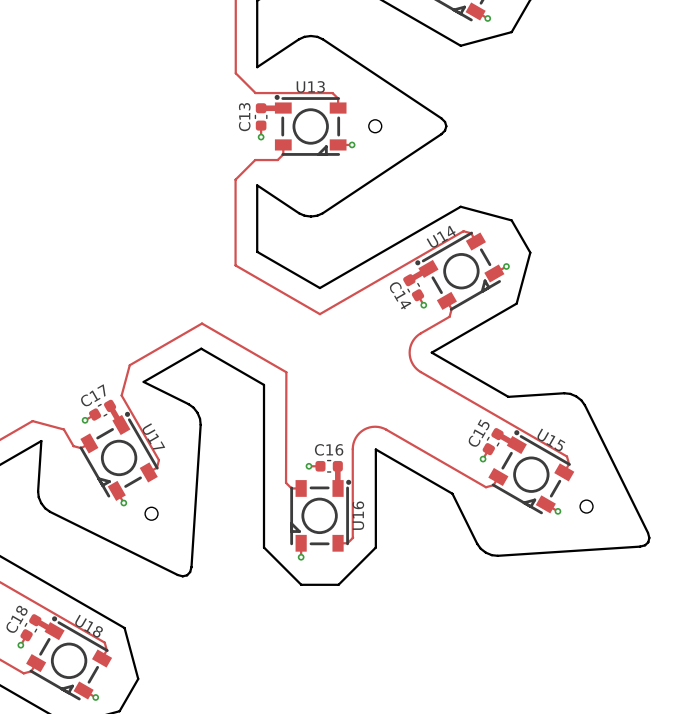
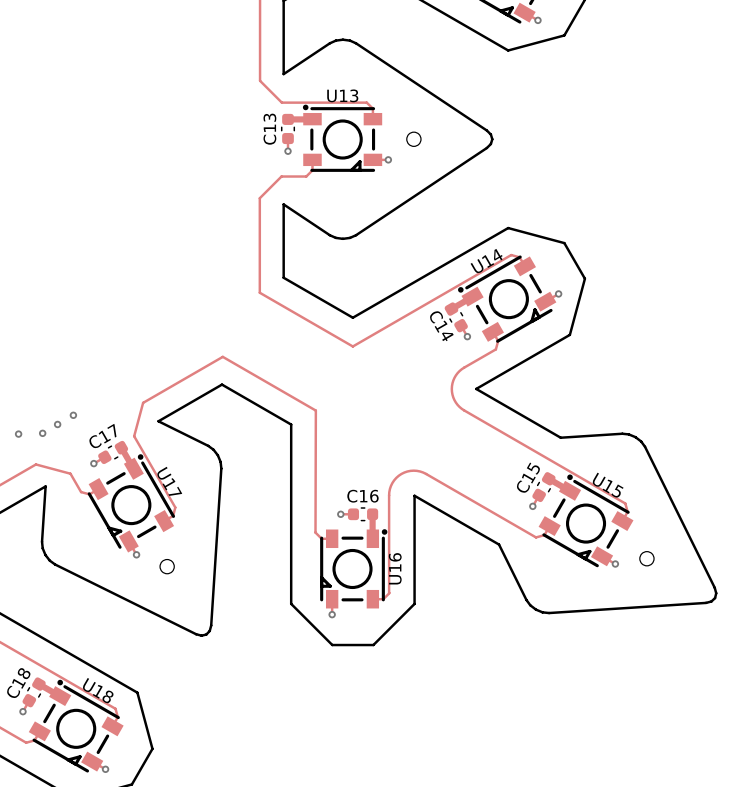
via: none -> (73, 415)
via: none -> (57, 424)
via: none -> (42, 433)
via: none -> (18, 434)

